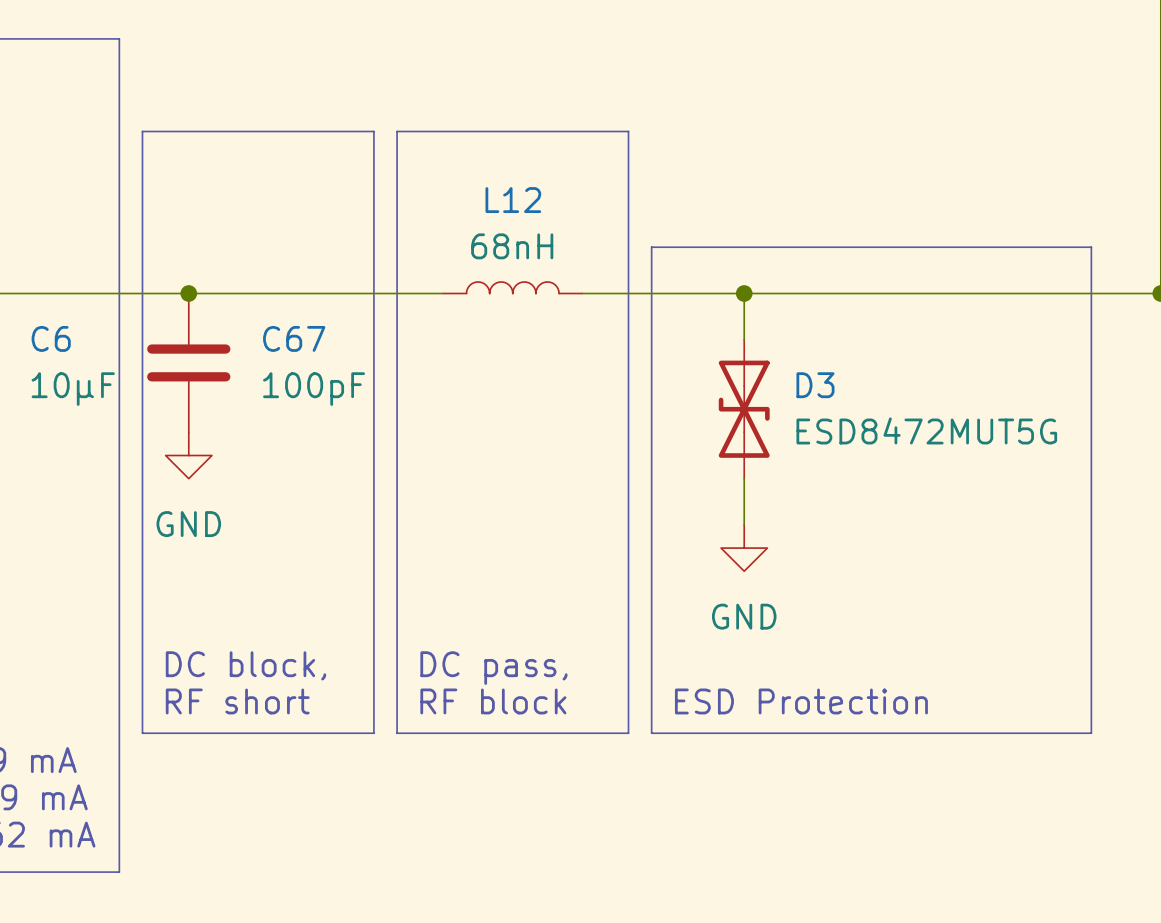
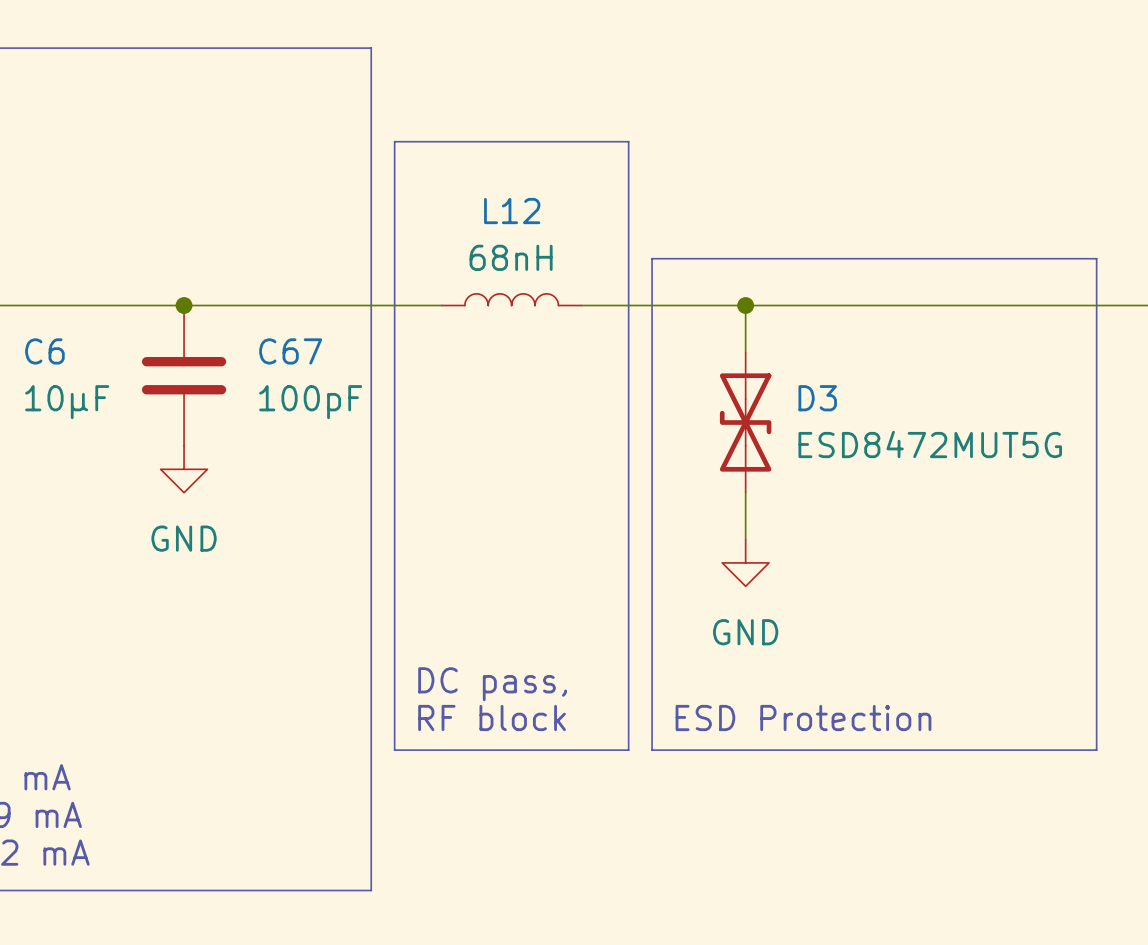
line: (119, 38) (119, 872) -> (371, 750) (371, 890) (113, 890)
line: (373, 131) (142, 131) (142, 733) (373, 733) -> (371, 141) (371, 48) (113, 48)
text: DC block, (245, 665) -> none
text: RF short (237, 701) -> none

